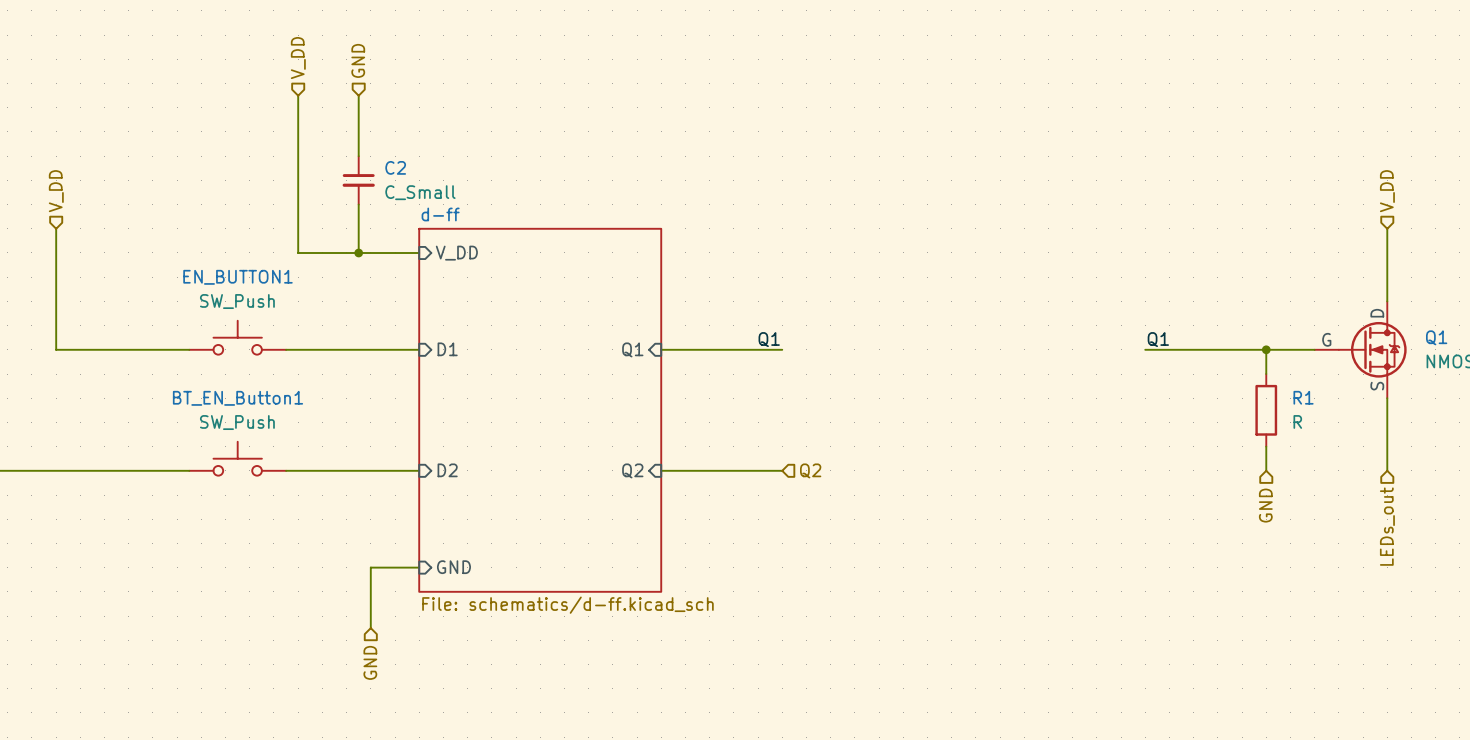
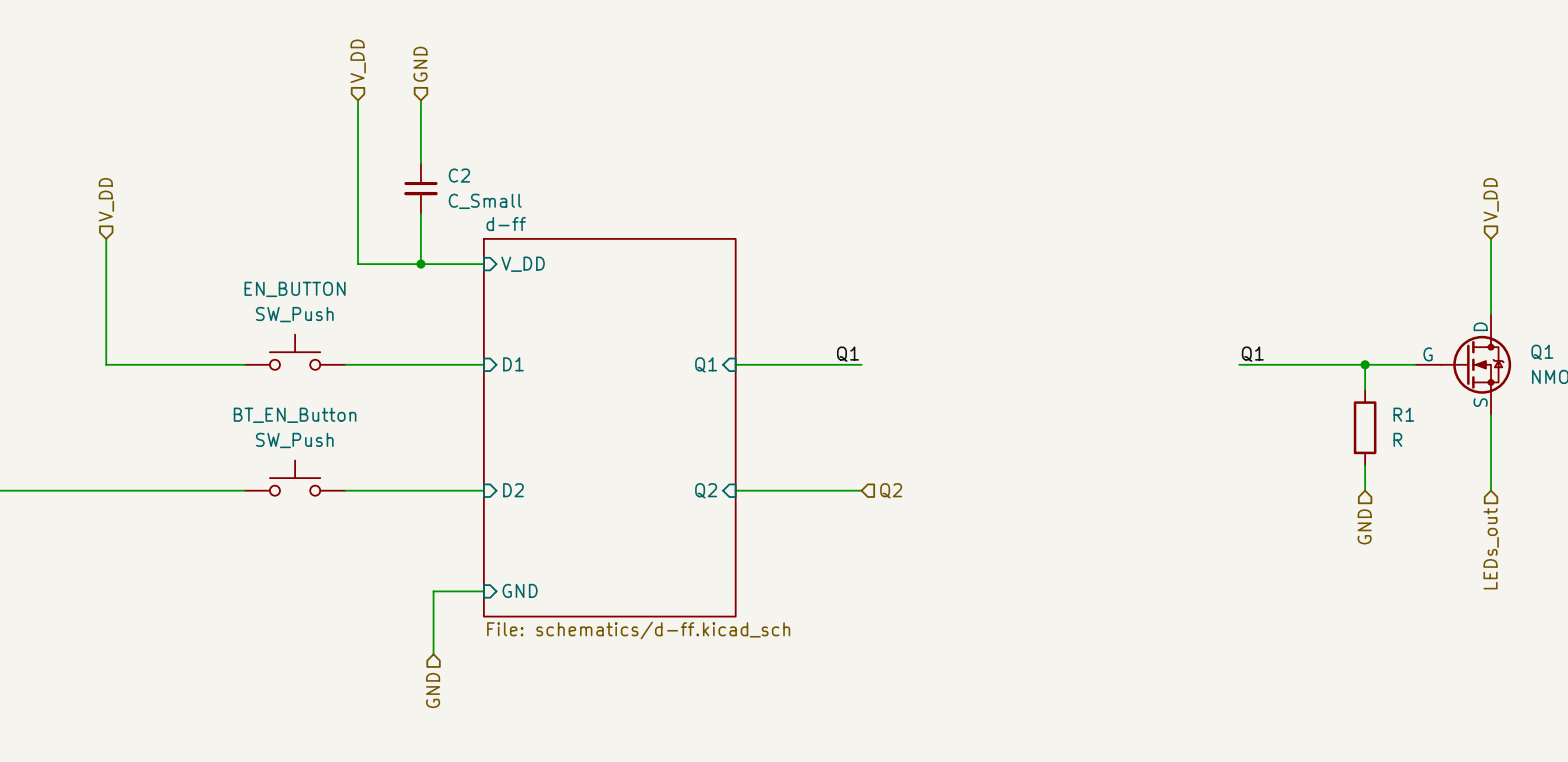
EN_BUTTON1 name: EN_BUTTON1 (237, 277) -> EN_BUTTON (295, 289)
BT_EN_Button1 name: BT_EN_Button1 (237, 398) -> BT_EN_Button (295, 415)

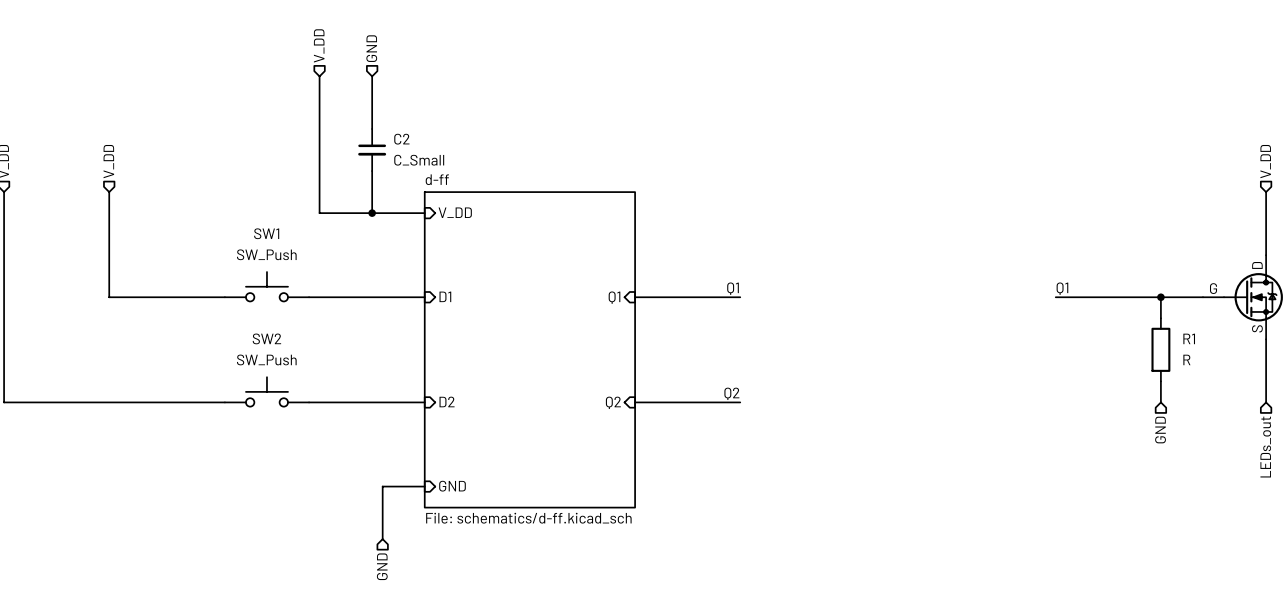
EN_BUTTON name: EN_BUTTON (295, 289) -> SW1 (266, 233)
BT_EN_Button name: BT_EN_Button (295, 415) -> SW2 (266, 338)
label: none -> Q2 (731, 393)
hierarchical label: Q2 (891, 490) -> none

